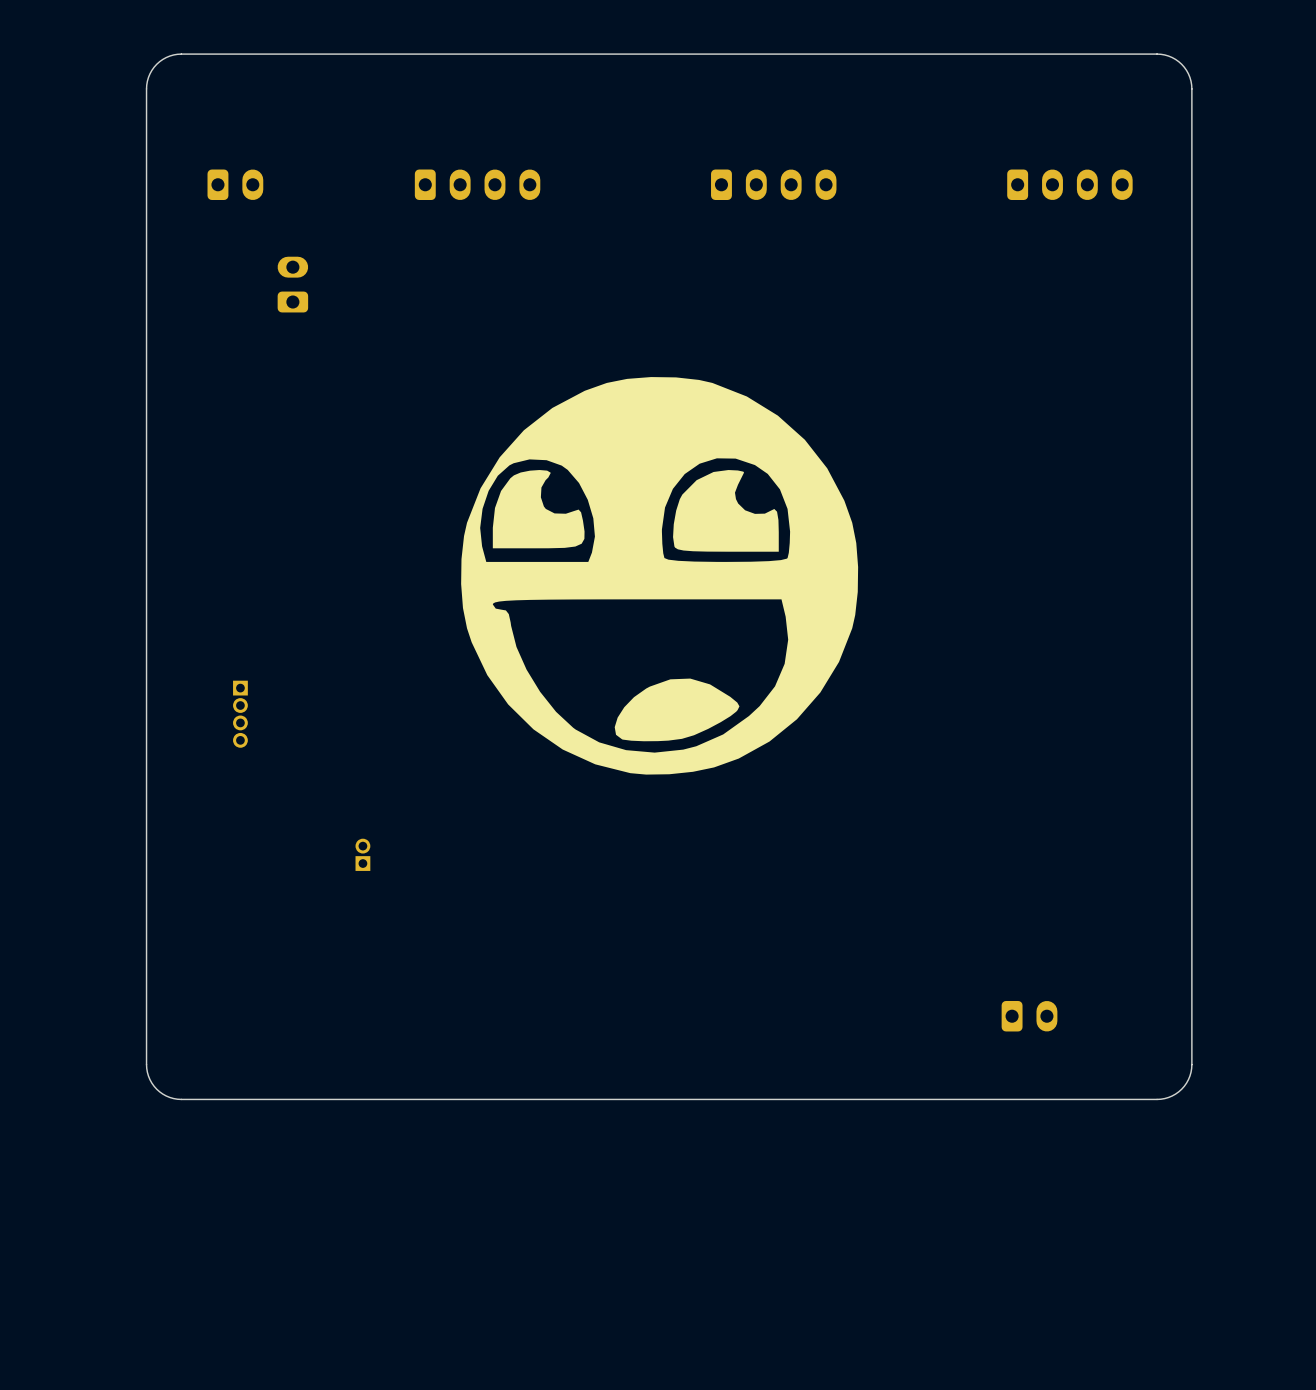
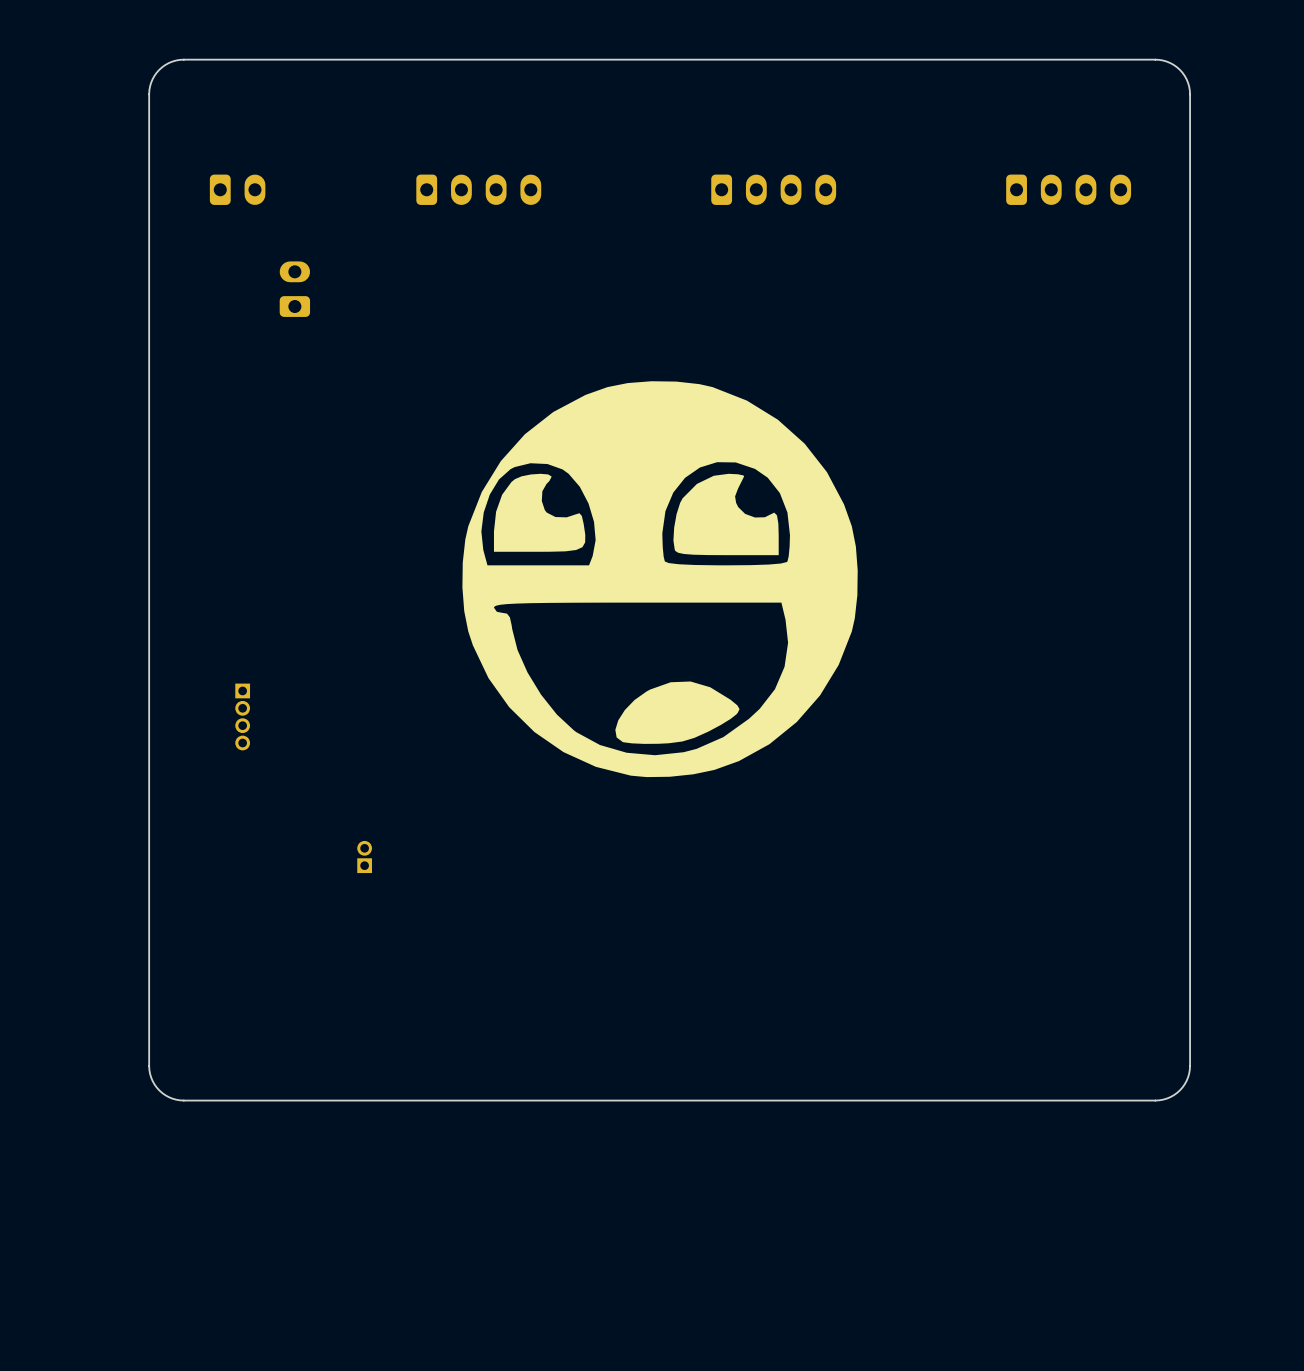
part: (1029, 1016) -> none

